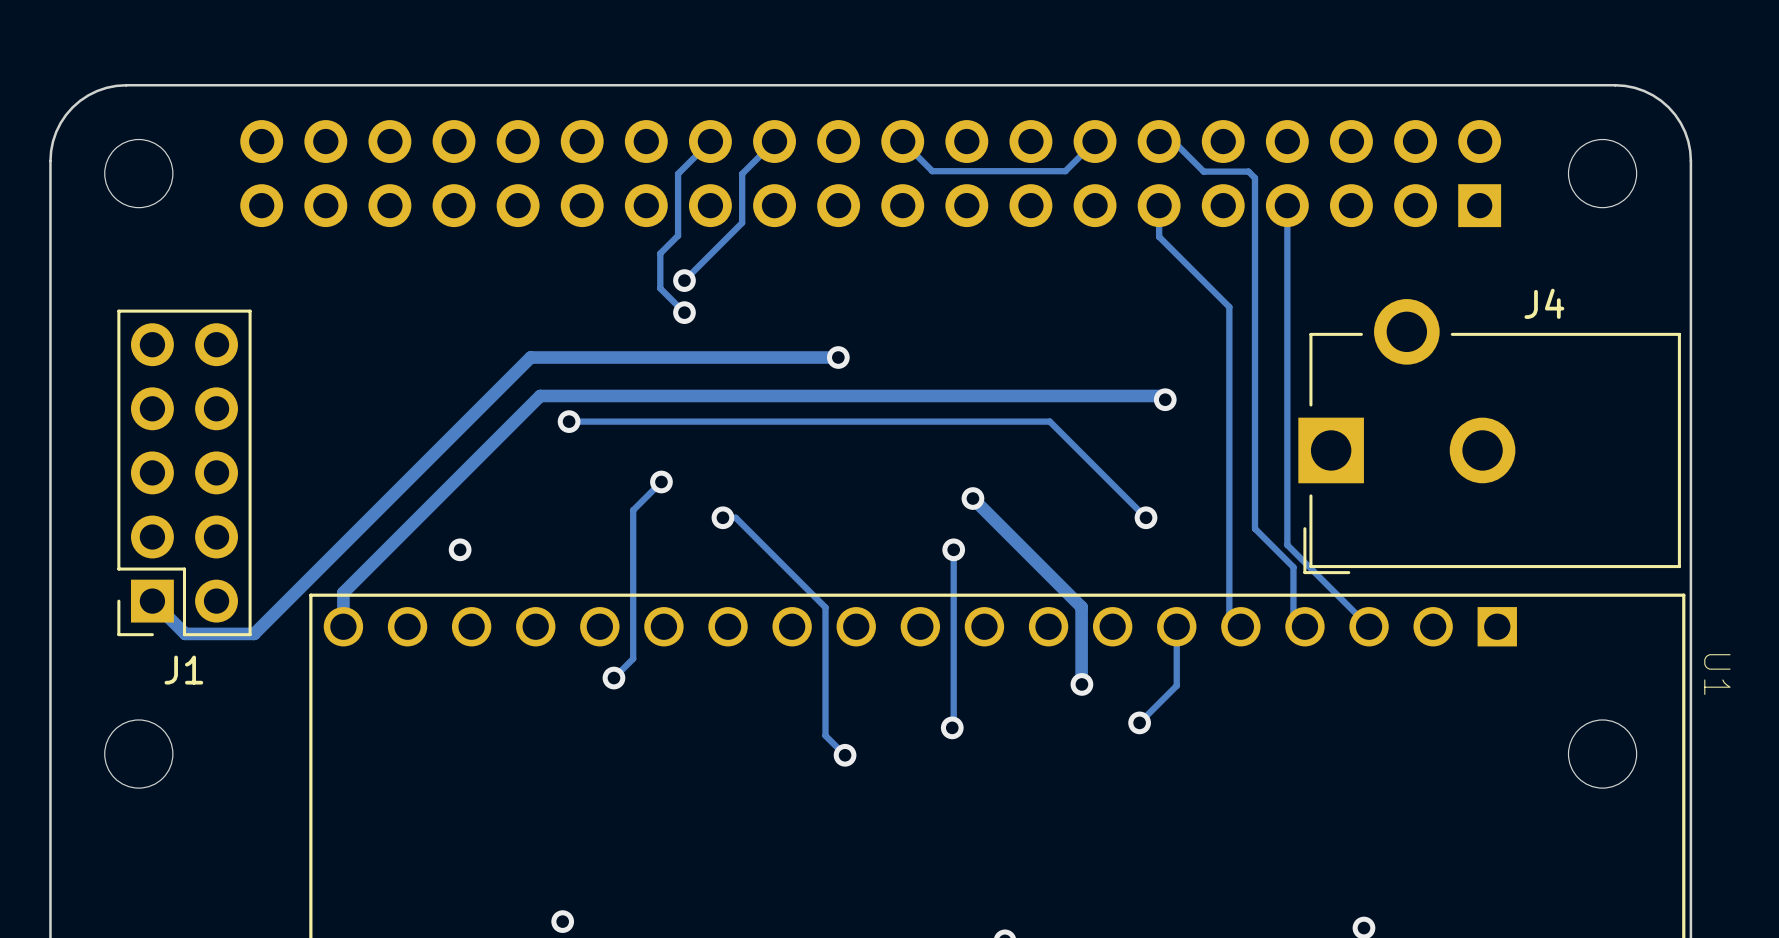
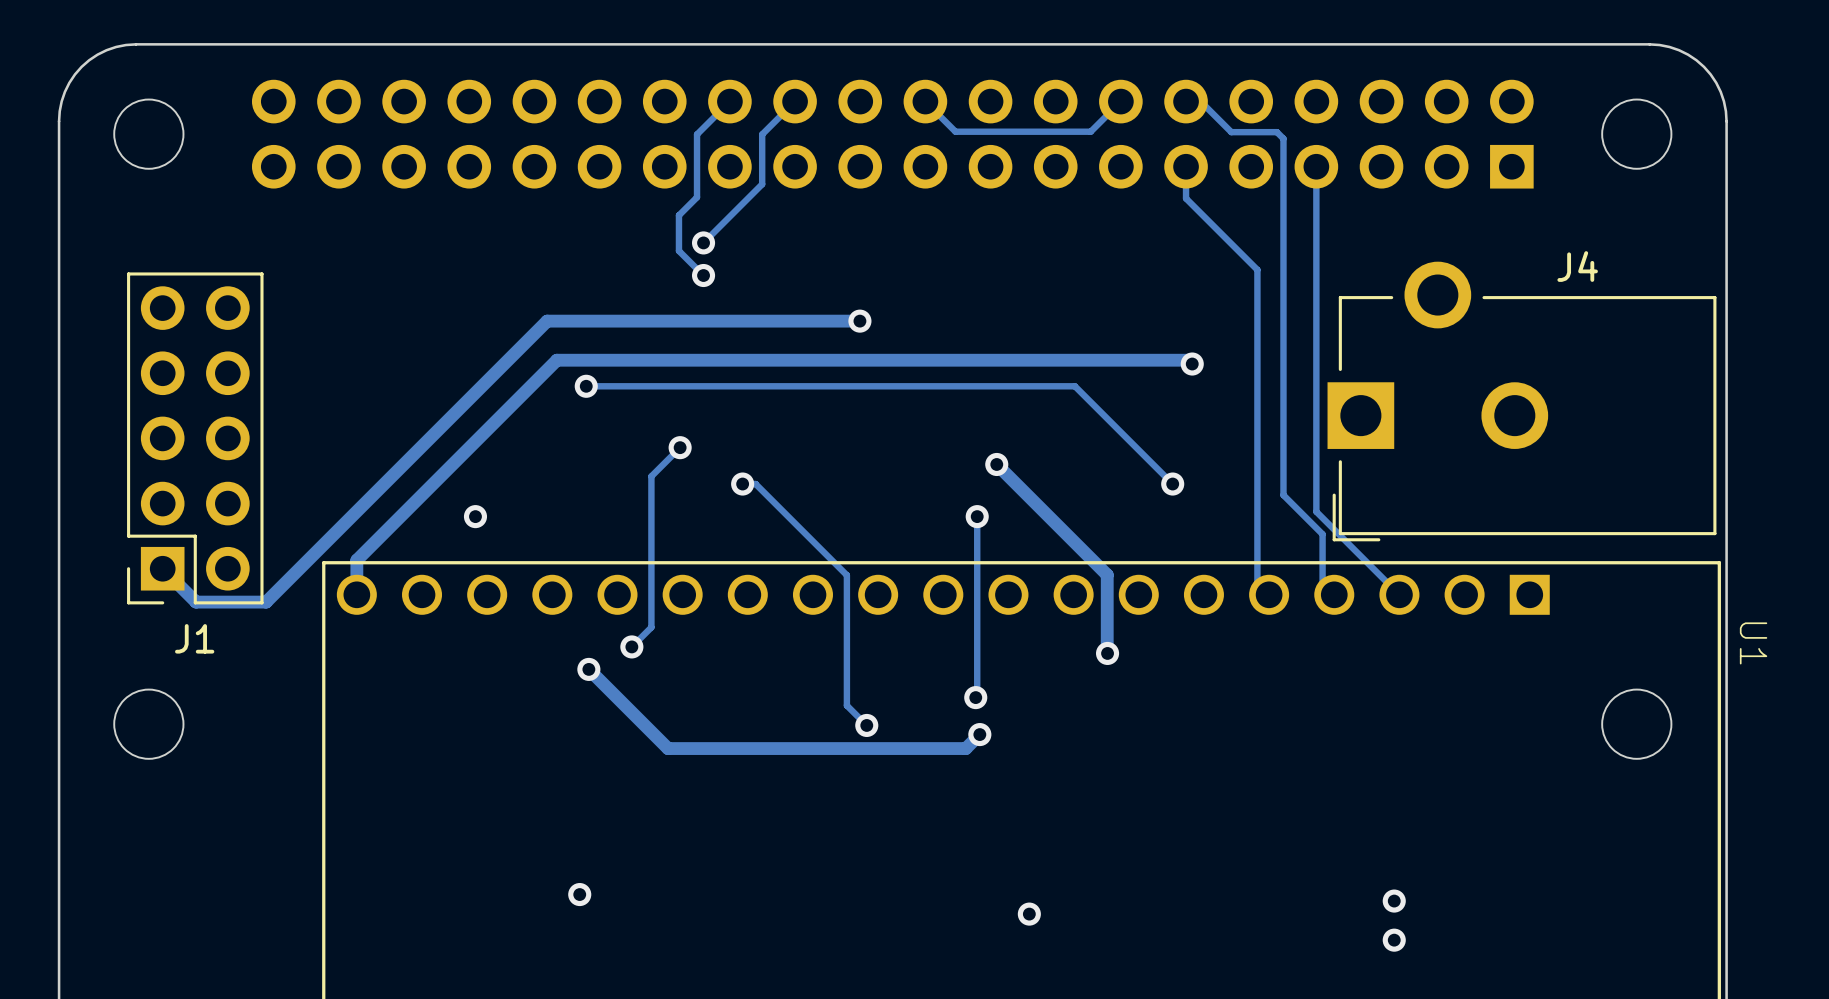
track: (1176, 626) (1176, 685) (1139, 722) -> none
track: none -> (588, 669) (668, 748) (965, 748) (979, 734)
via: none -> (588, 669)
via: (1139, 722) -> none
via: none -> (979, 734)

